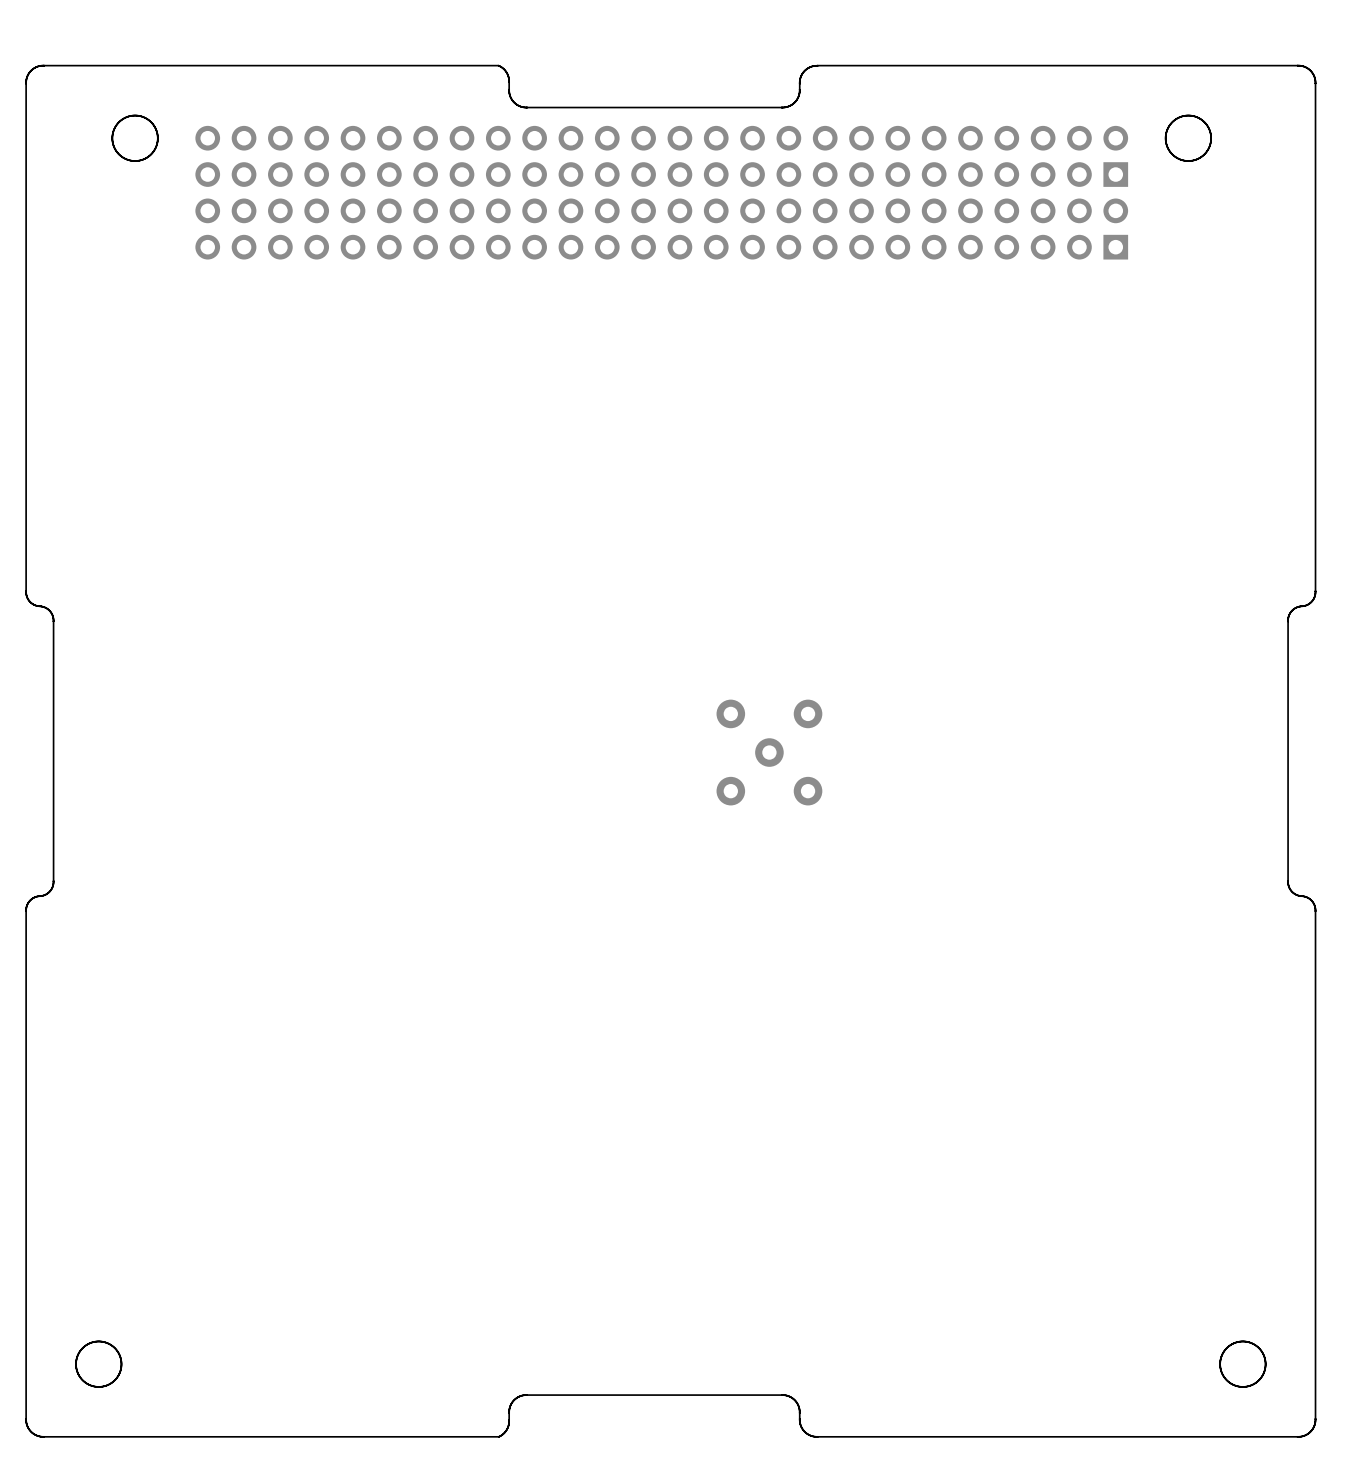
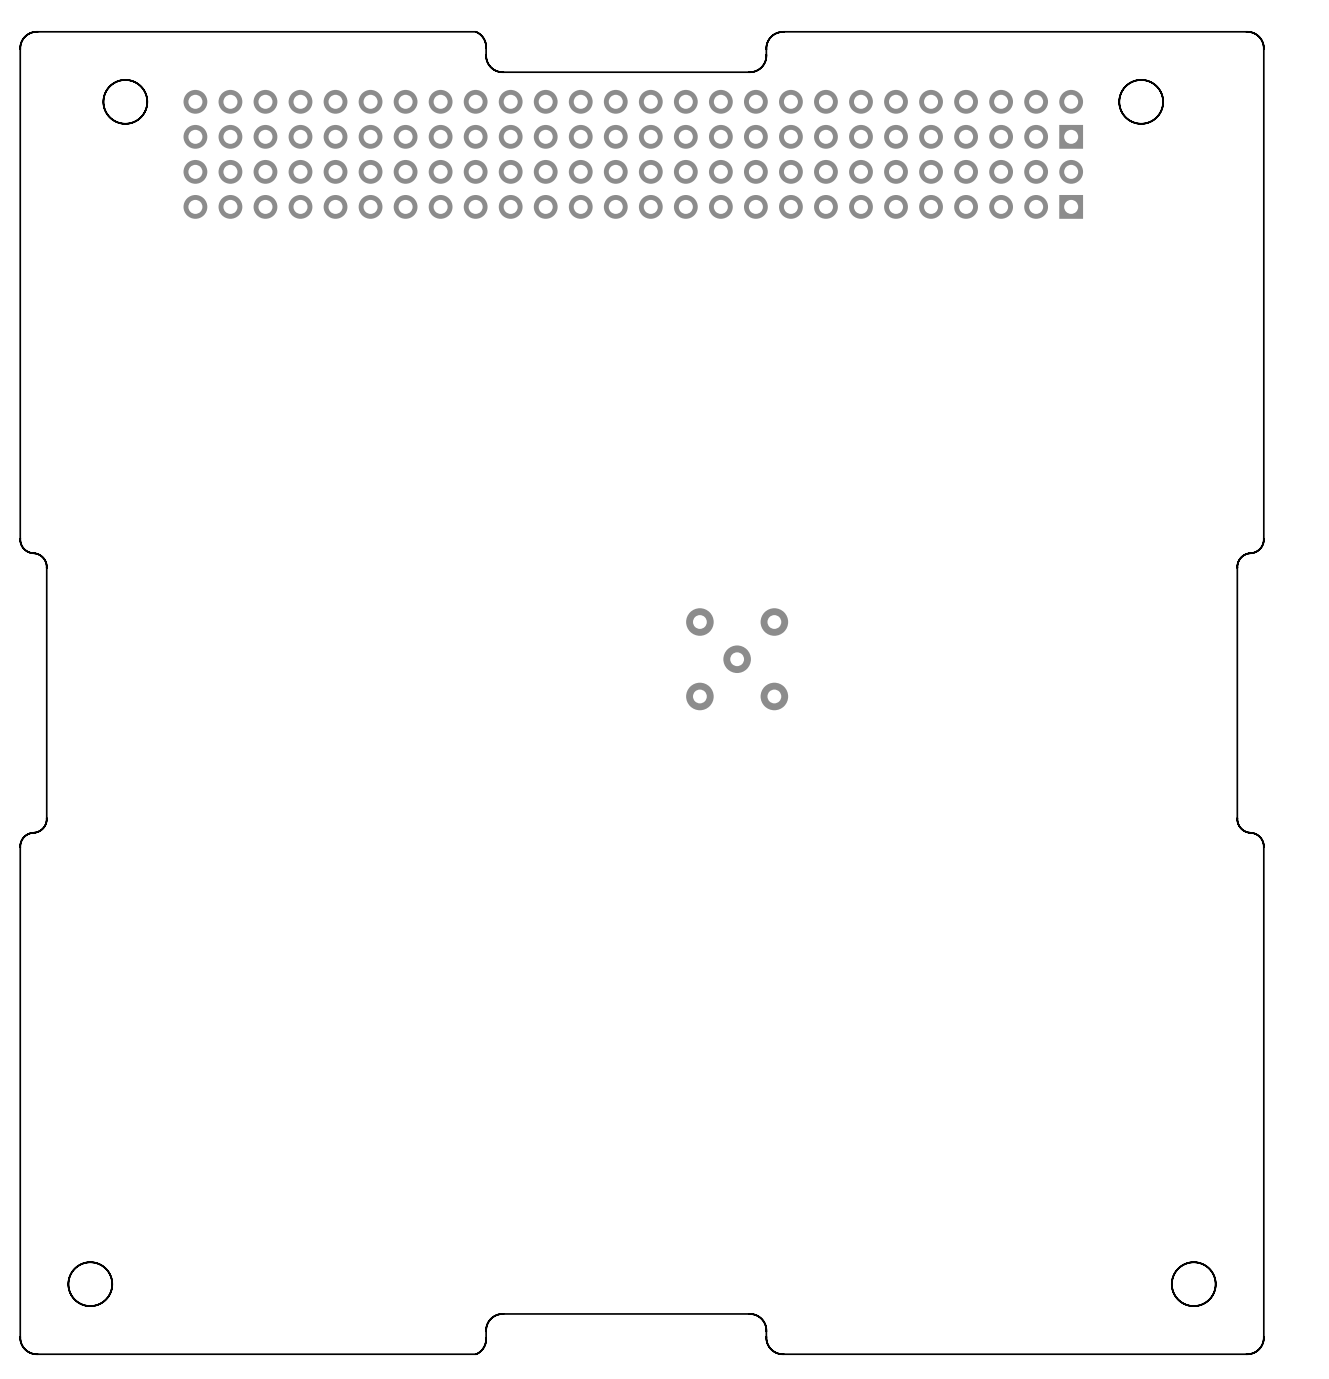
part position: (769, 752) -> (737, 659)

